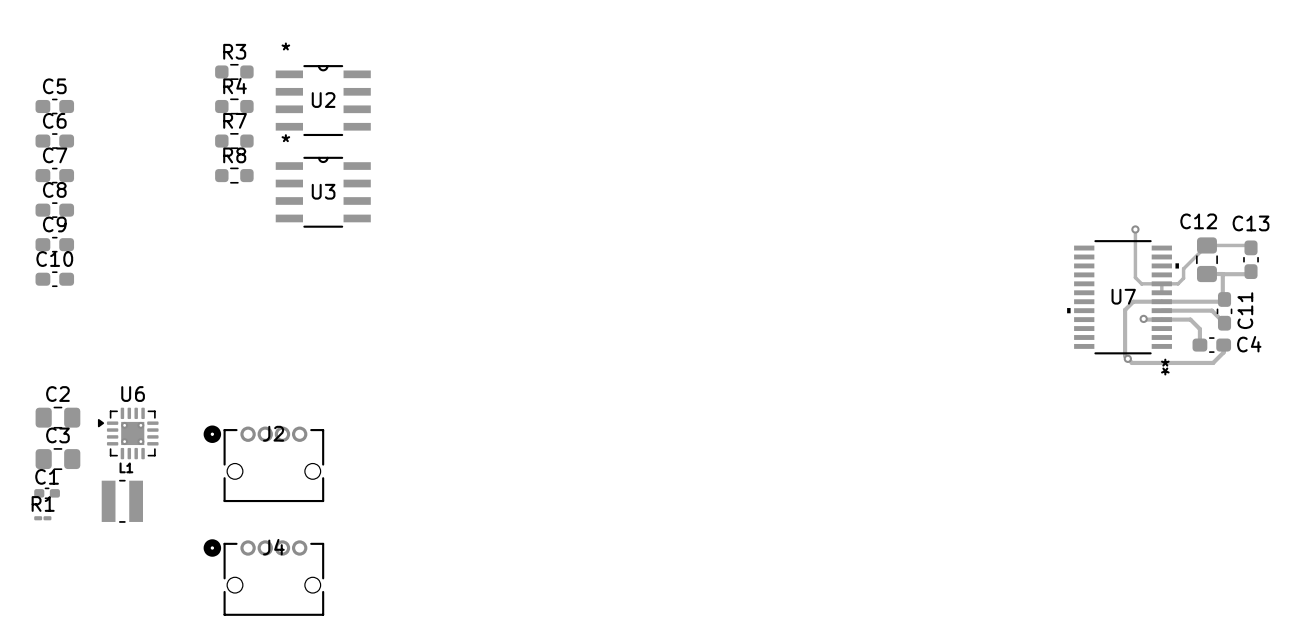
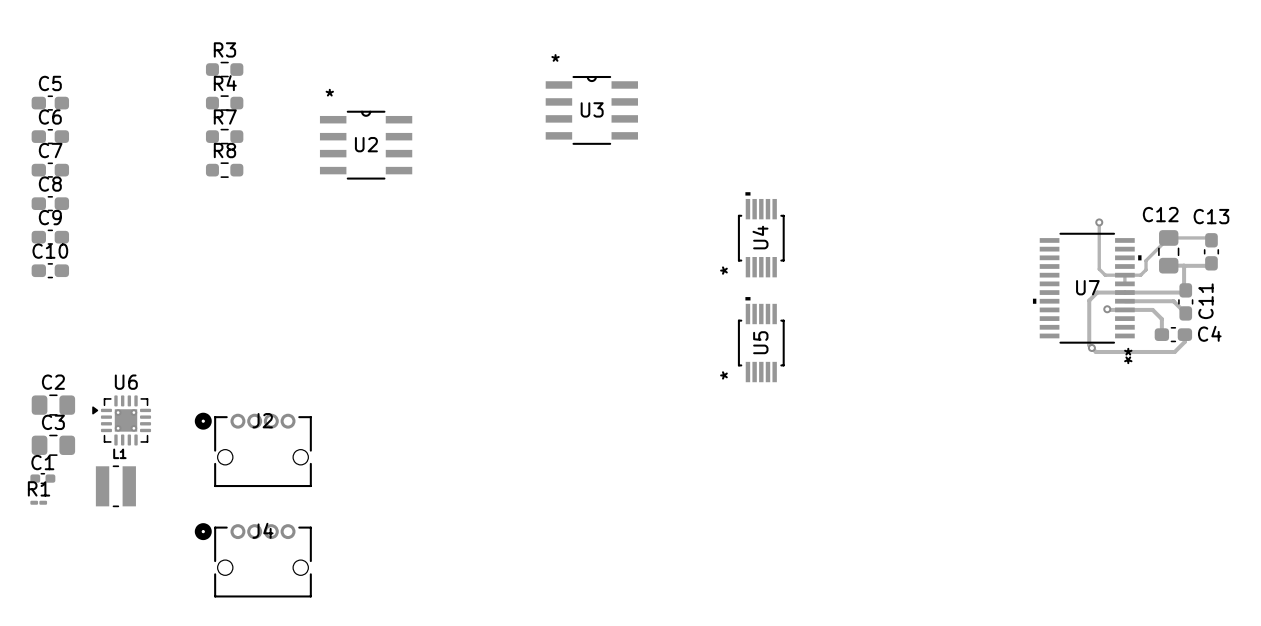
U2 position: (323, 100) -> (366, 145)
U3 position: (323, 192) -> (591, 110)
U4: none -> (761, 234)
U5: none -> (761, 339)

